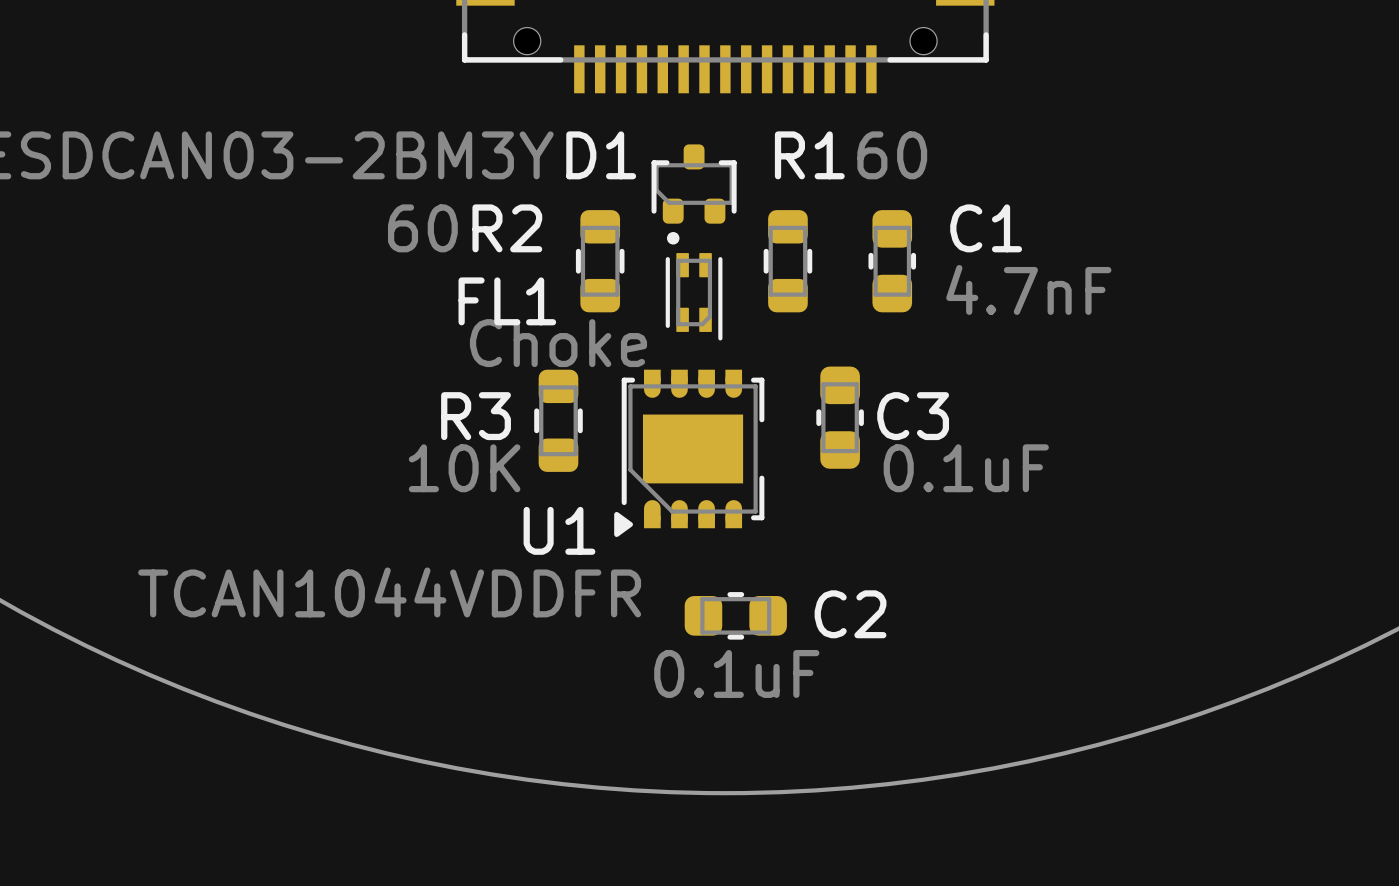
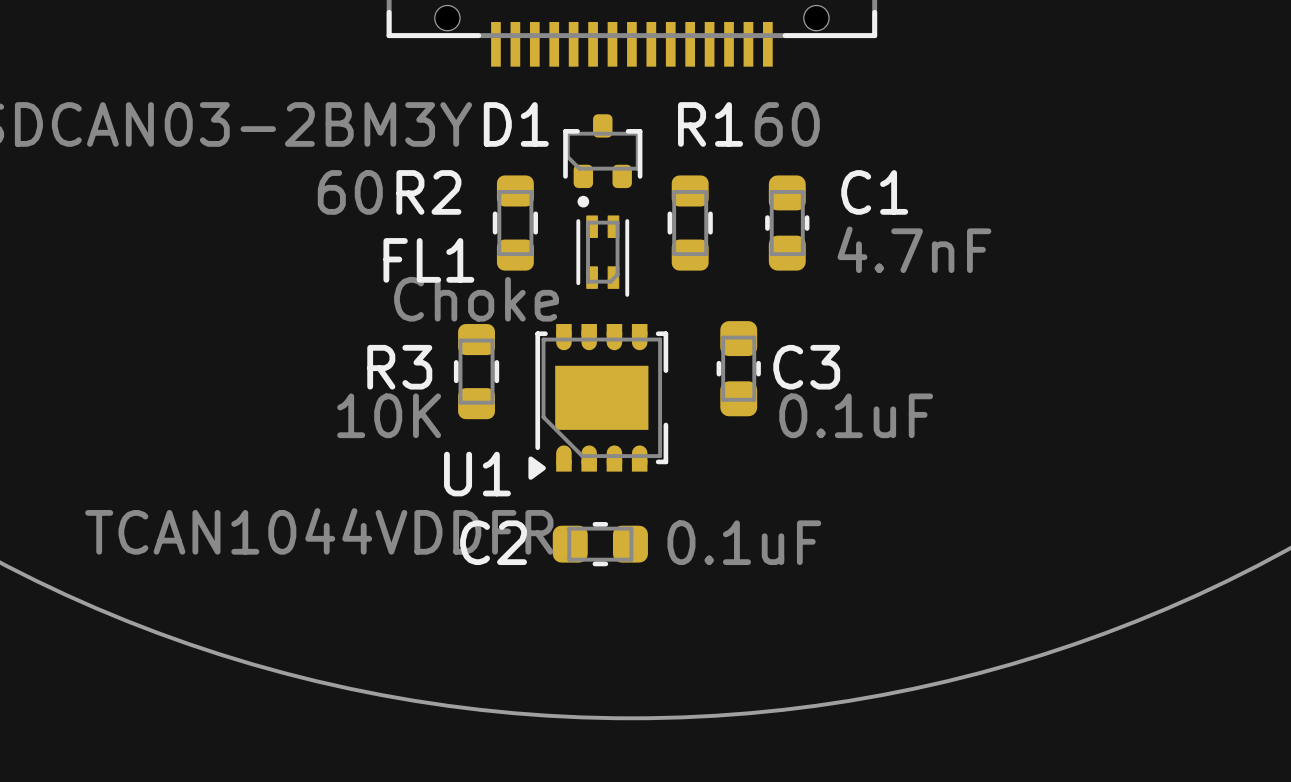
C2 name position: C2 (850, 614) -> C2 (493, 542)
C2 position: (735, 615) -> (600, 544)
C2 value position: 0.1uF (736, 673) -> 0.1uF (744, 542)

